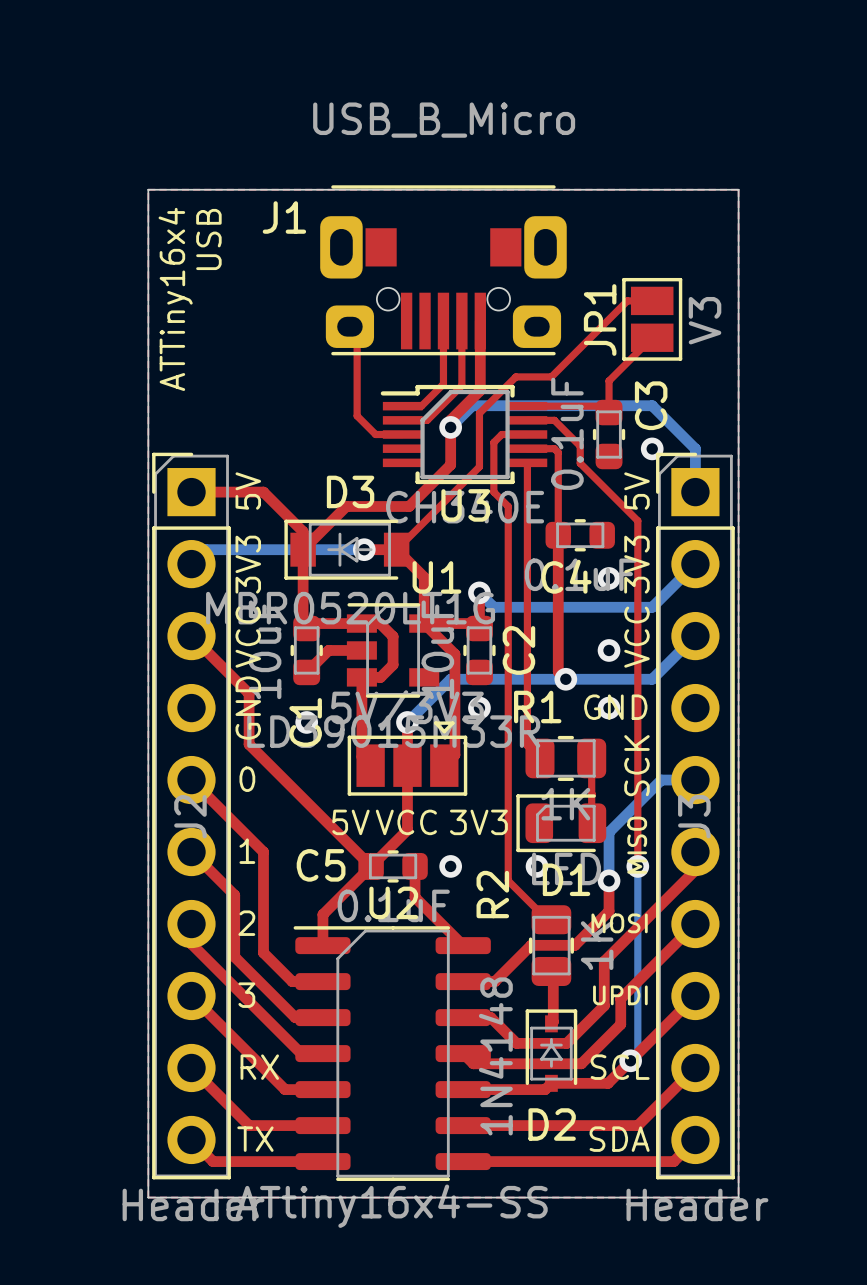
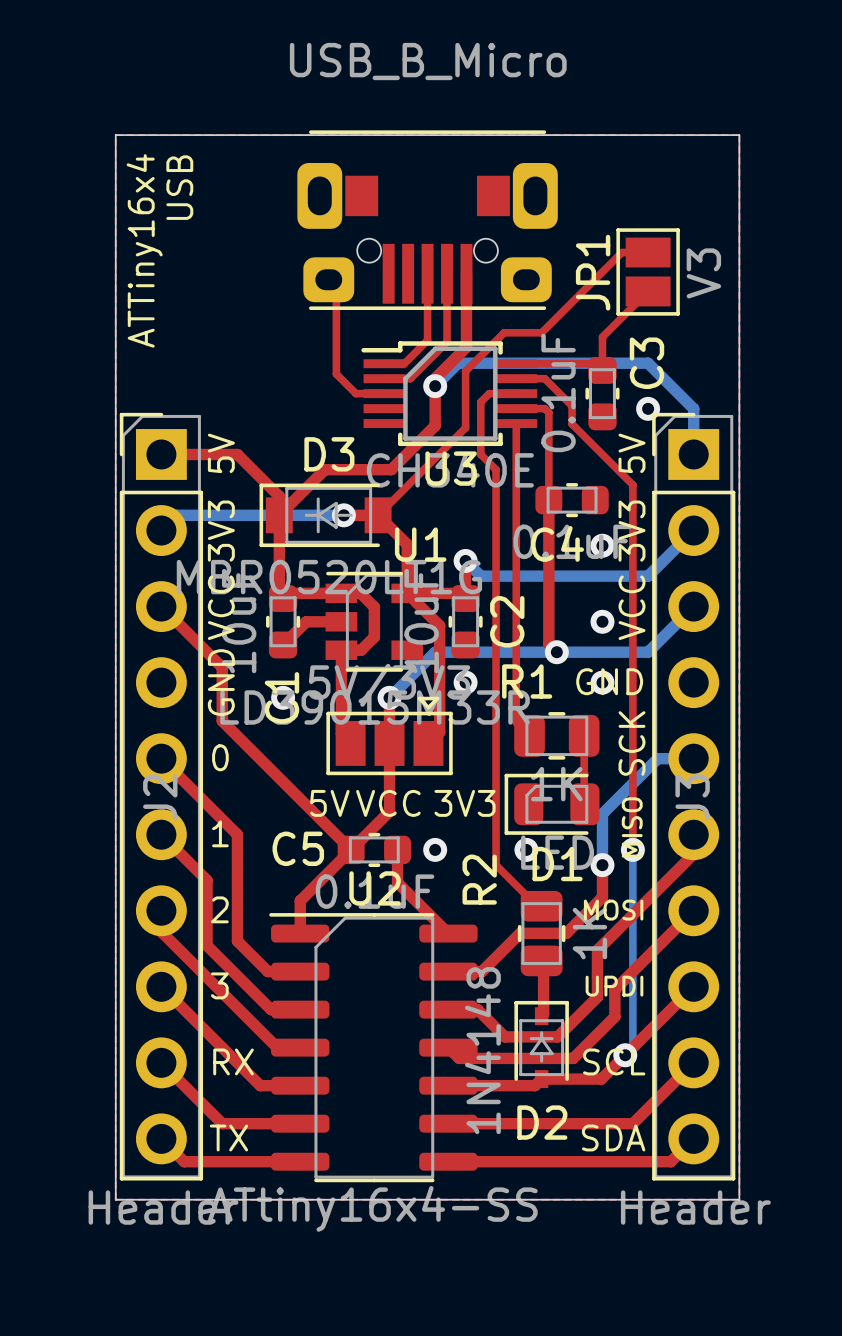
J1 name: J1 (284, 217) -> none

